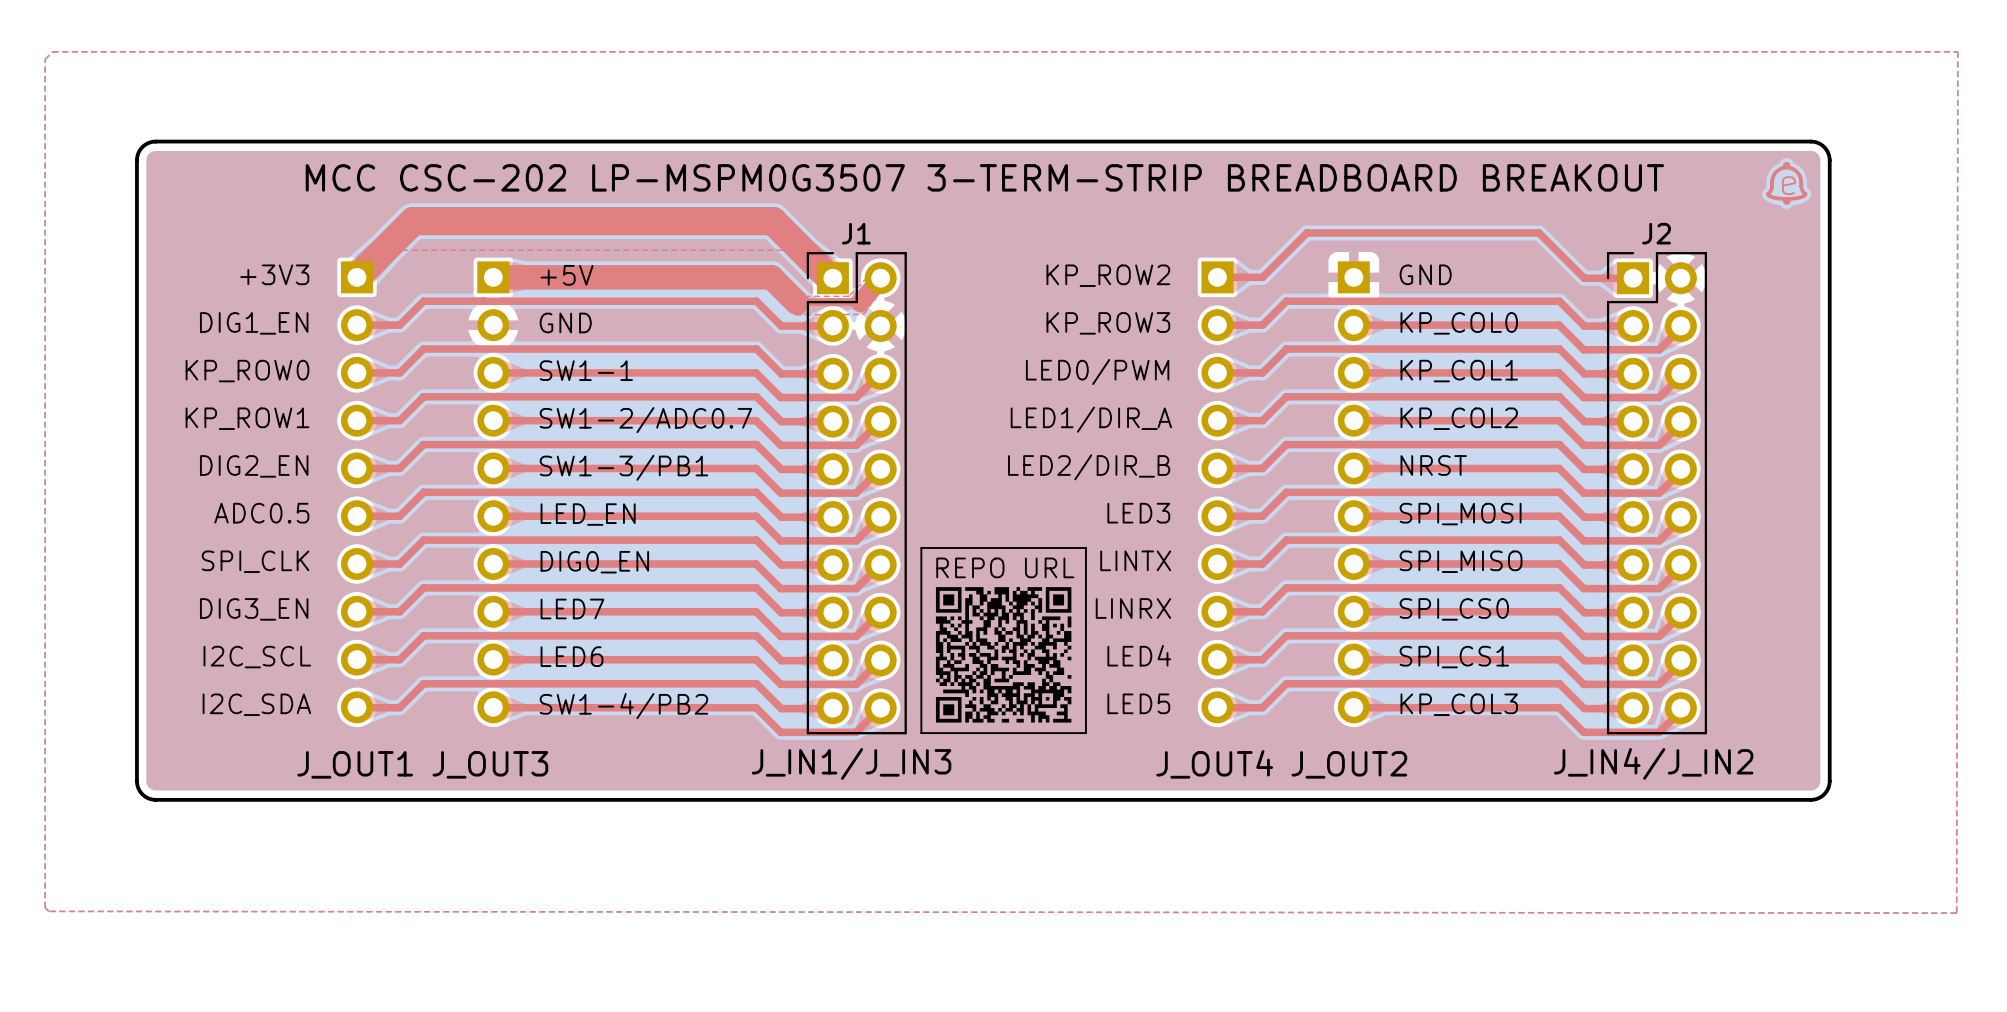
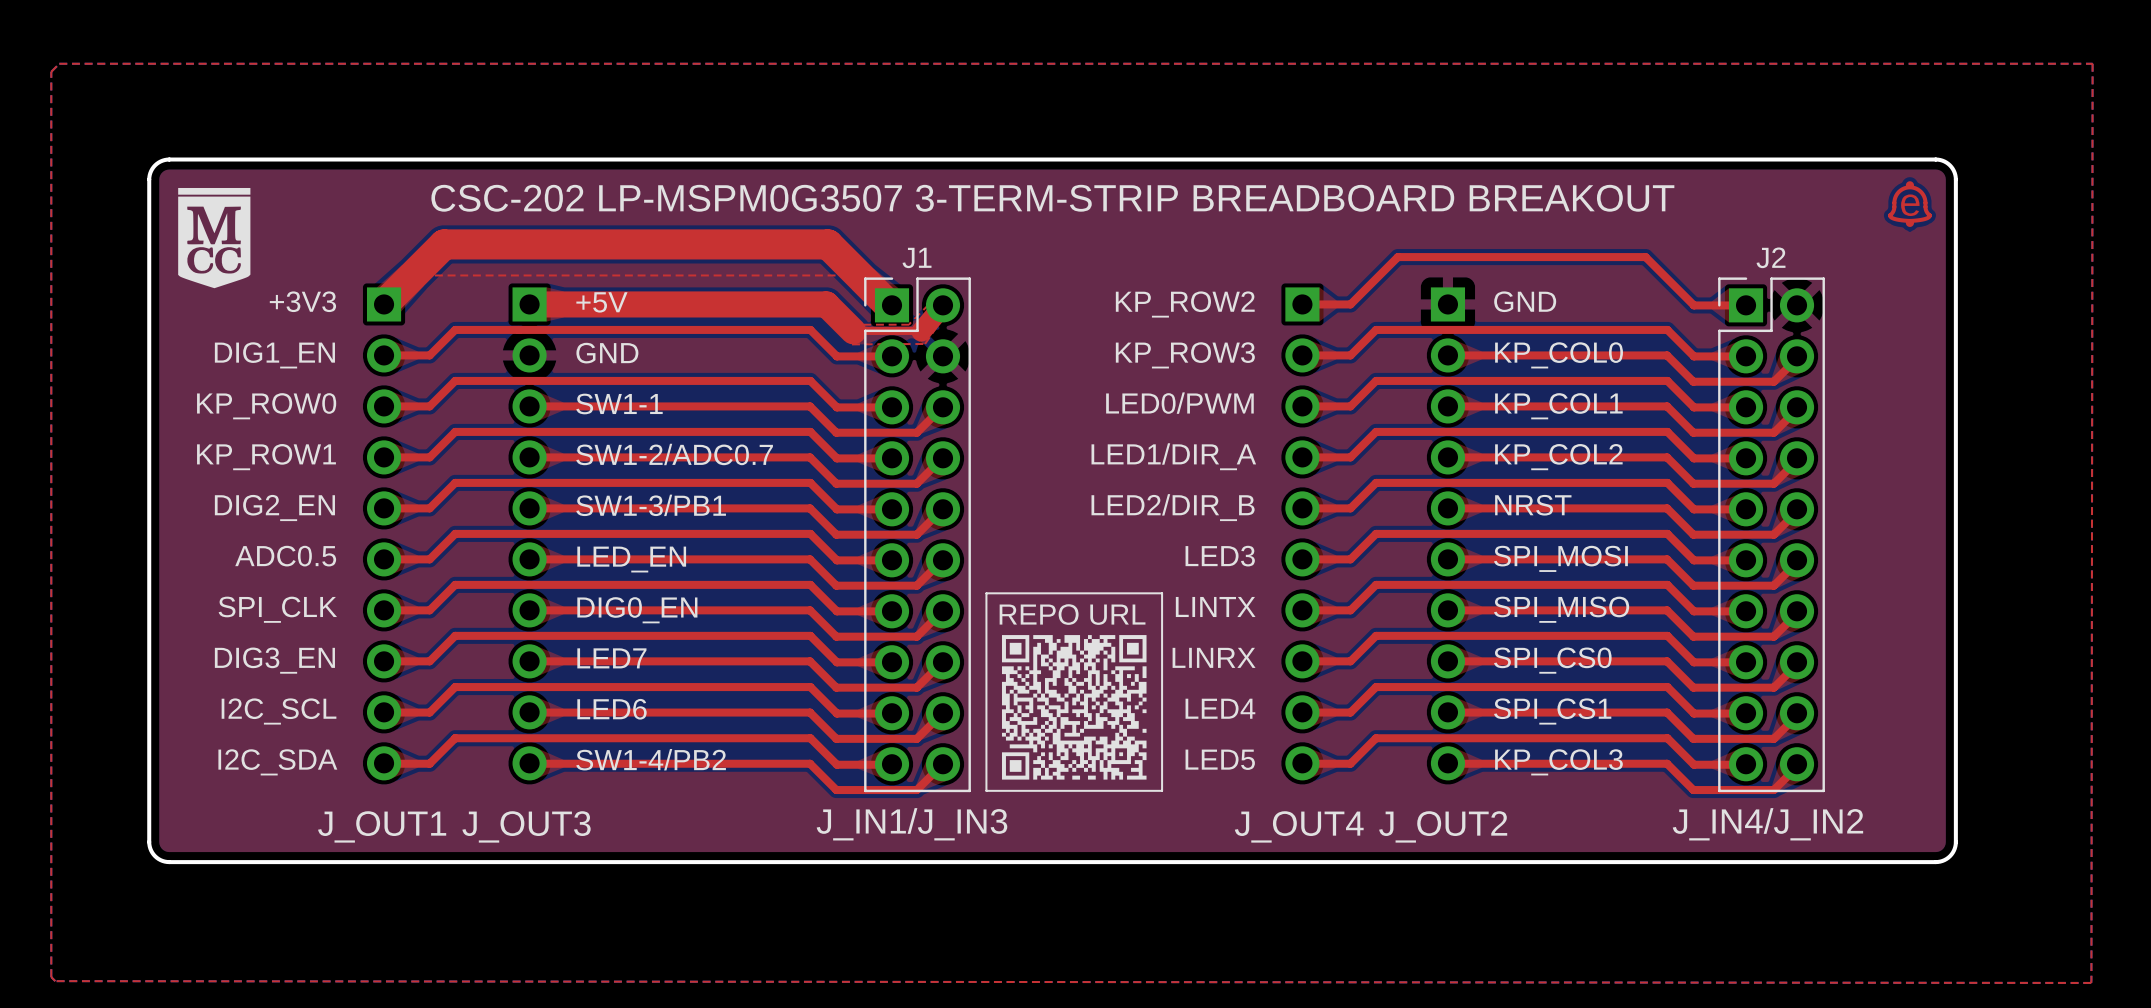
drawing: none -> [178, 187, 251, 289]
text: MCC CSC-202 LP-MSPM0G3507 3-TERM-STRIP BREADBOARD BREAKOUT (984, 177) -> CSC-202 LP-MSPM0G3507 3-TERM-STRIP BREADBOARD BREAKOUT (1052, 198)

